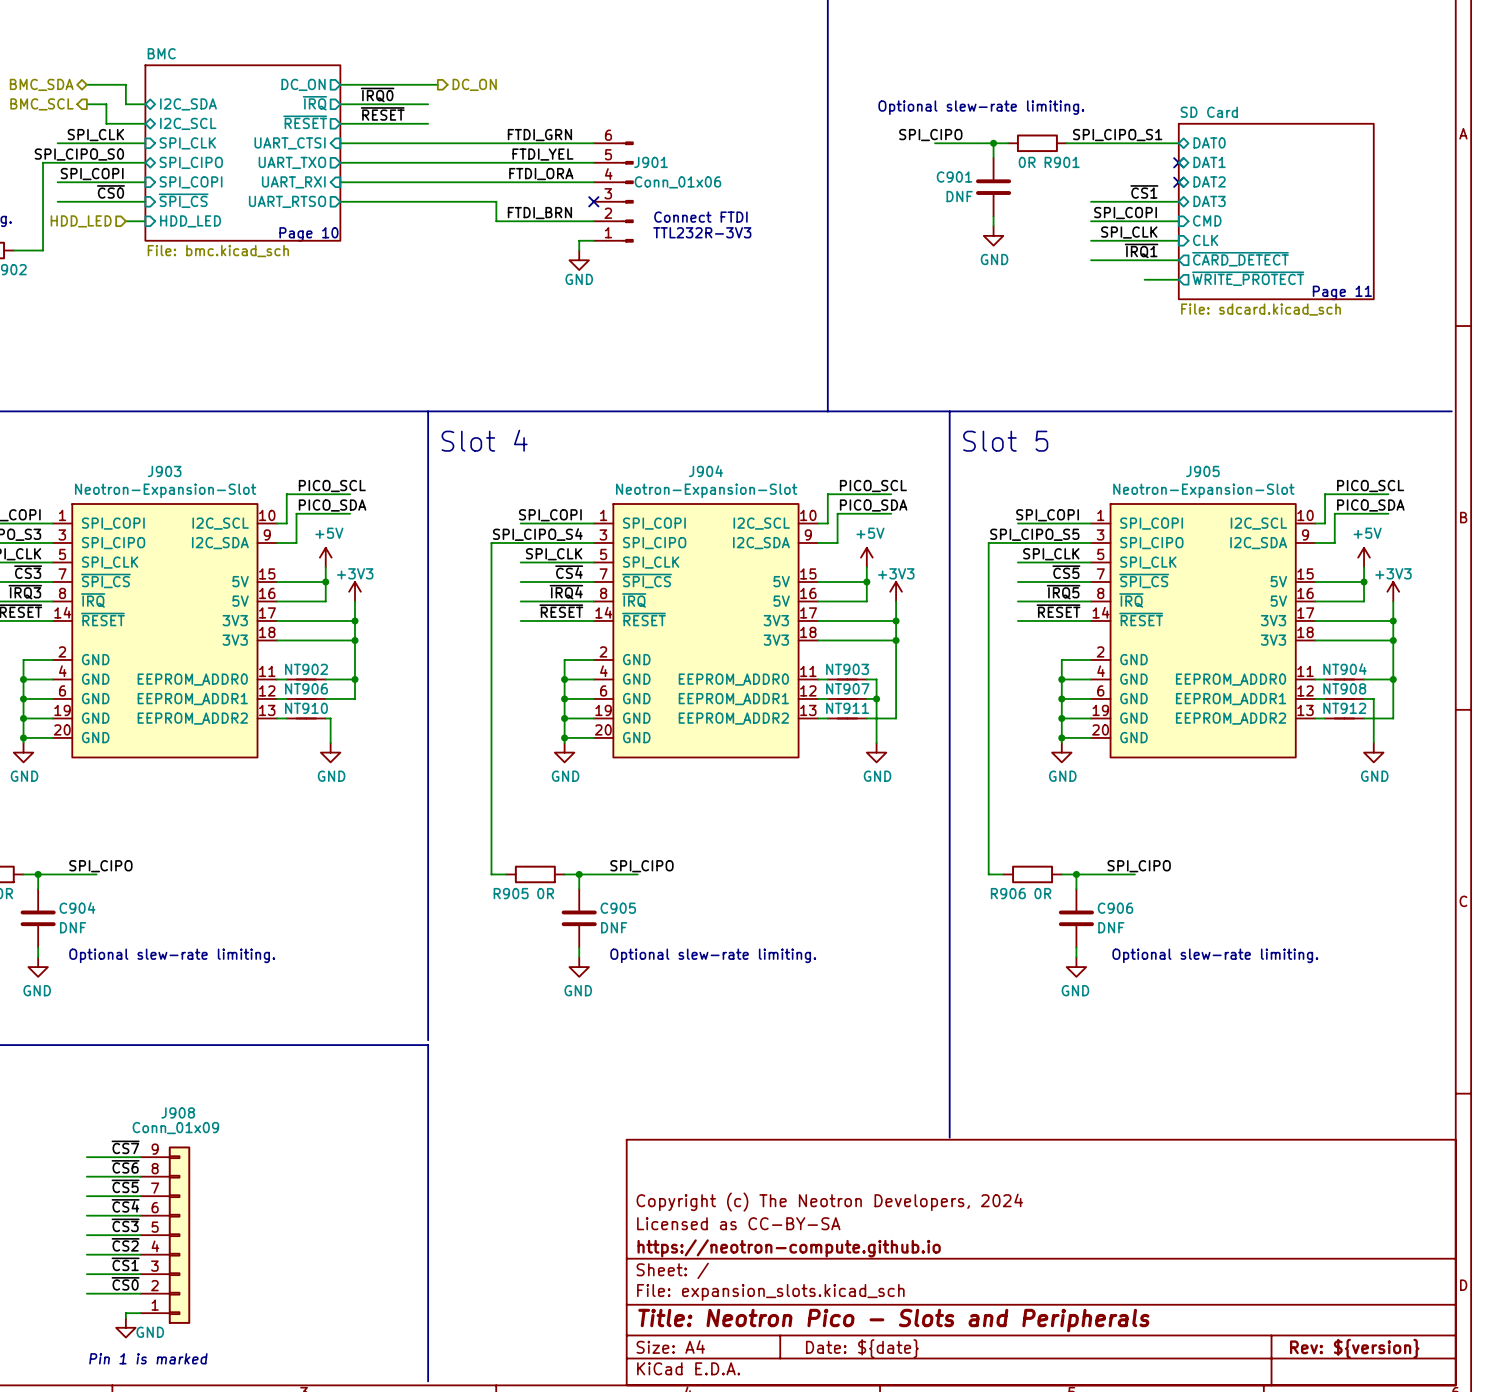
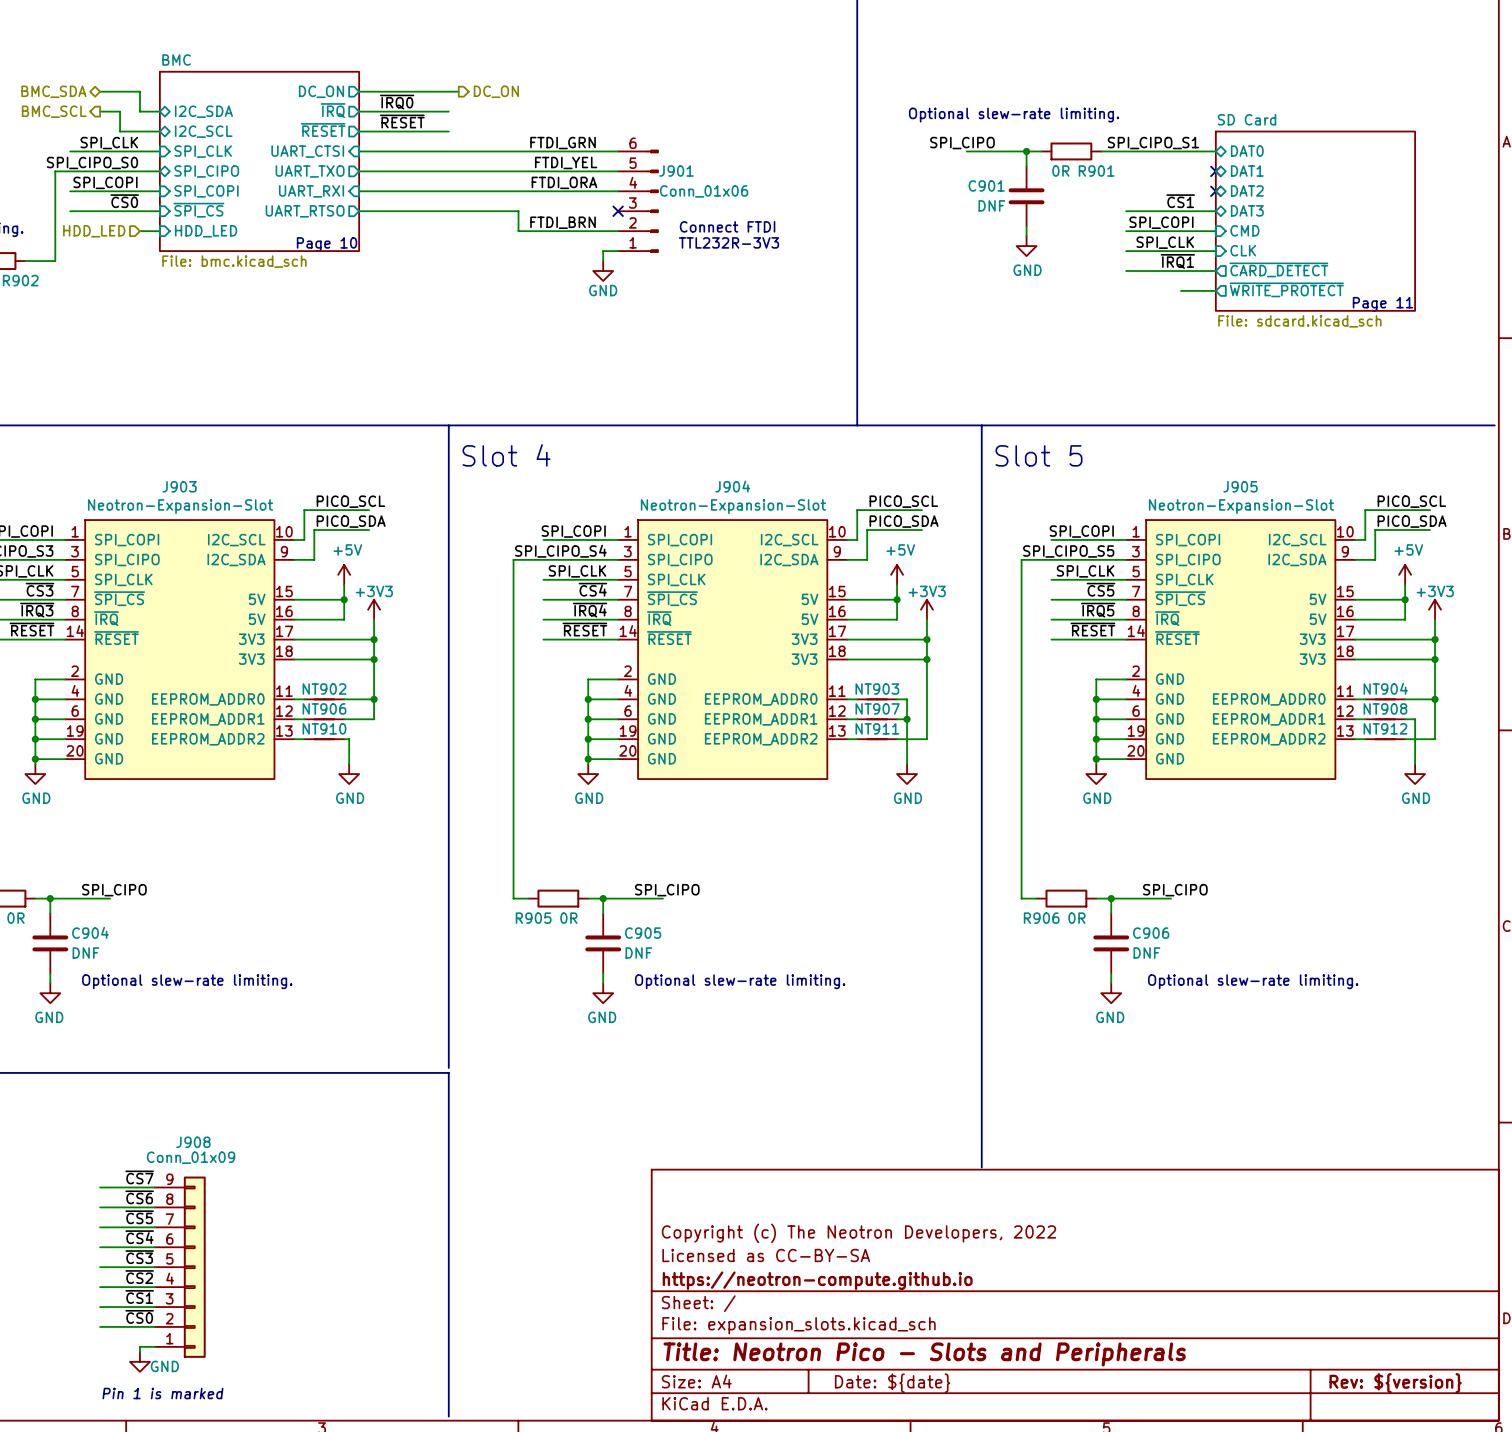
title block: Copyright (c) The Neotron Developers, 2024 (829, 1202) -> Copyright (c) The Neotron Developers, 2022 (858, 1233)

